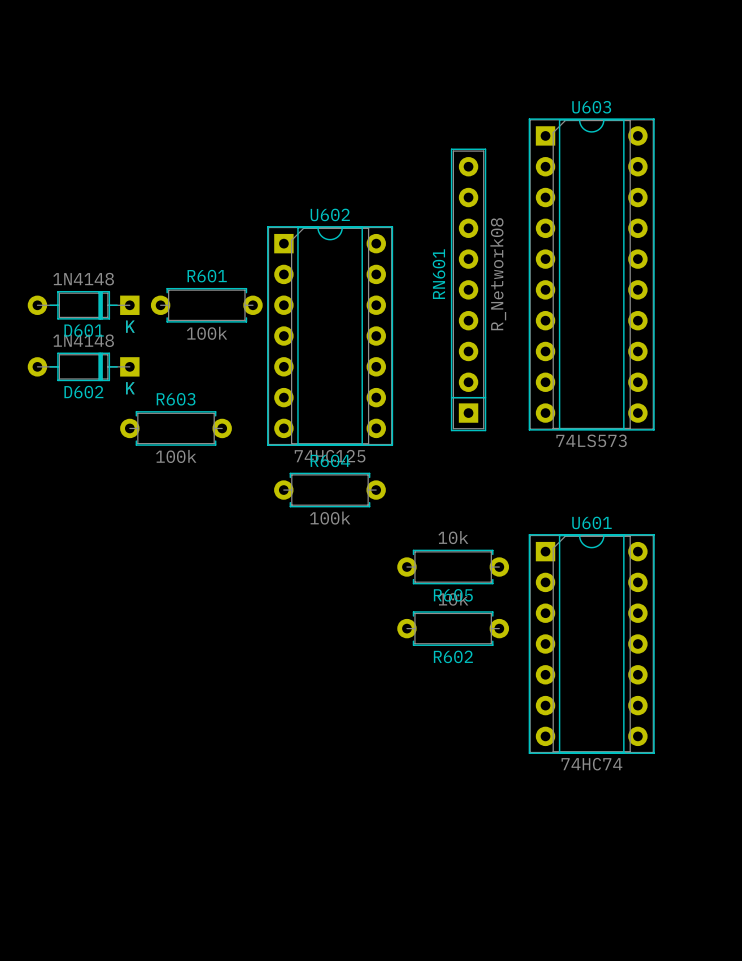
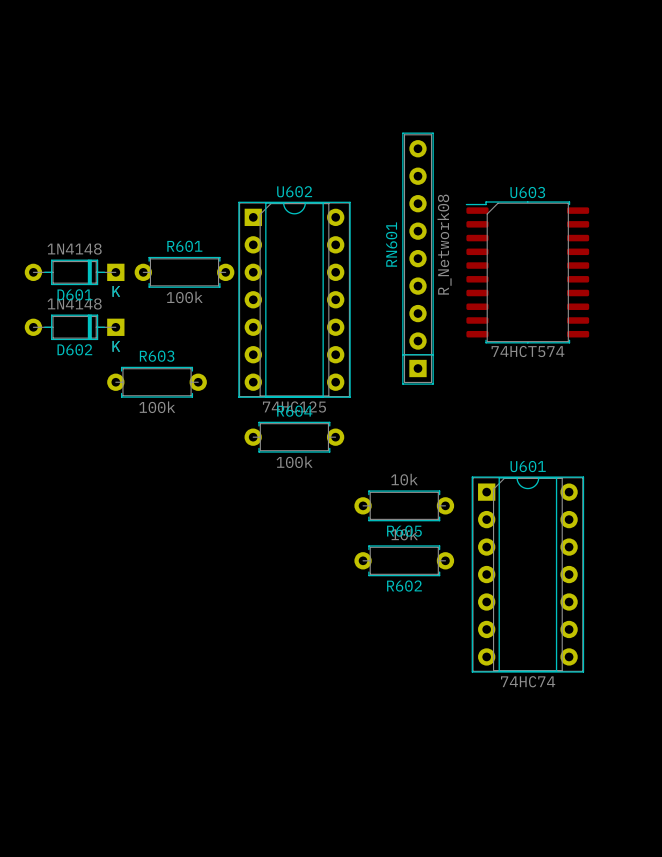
U603 name position: U603 (591, 107) -> U603 (527, 192)
U603 footprint: [528, 118, 655, 431] -> [465, 201, 590, 344]
U603 value: 74LS573 (591, 440) -> 74HCT574 (527, 351)

